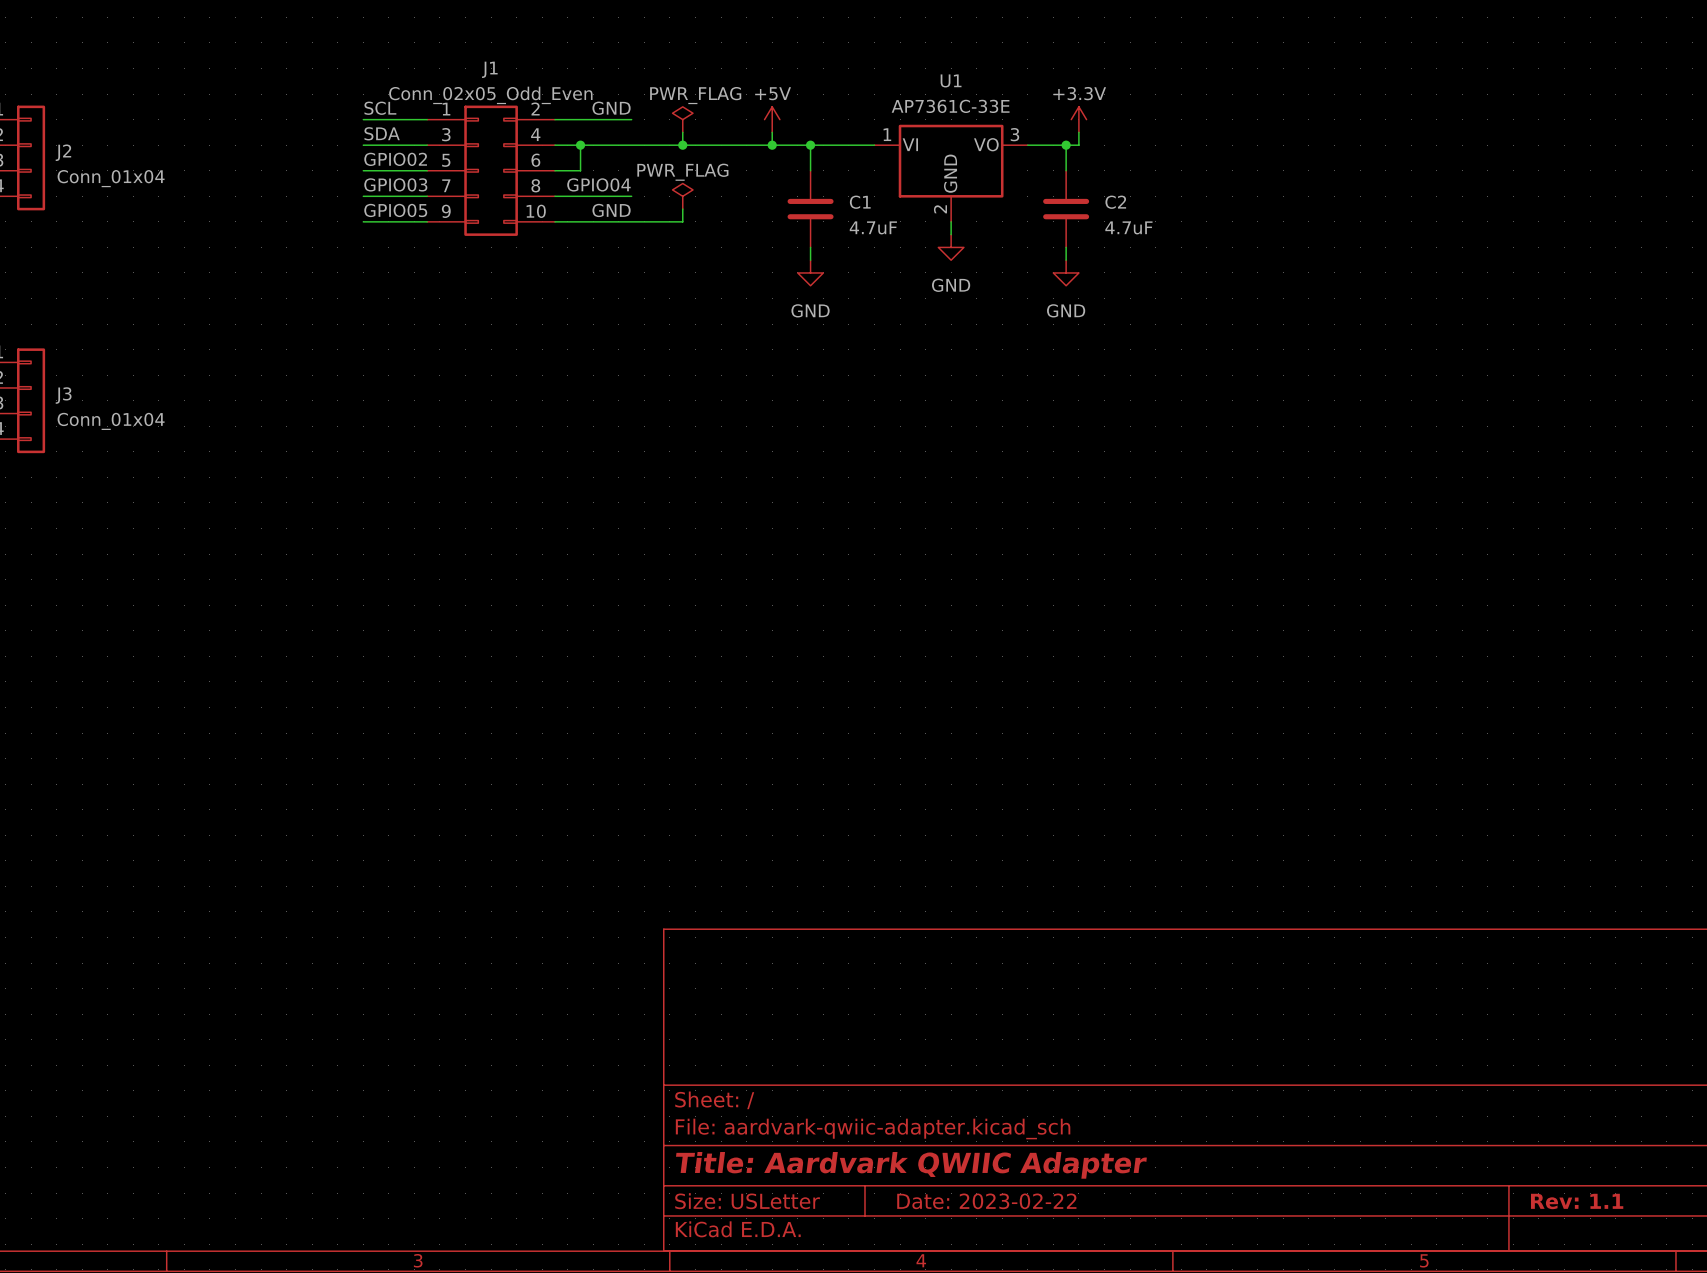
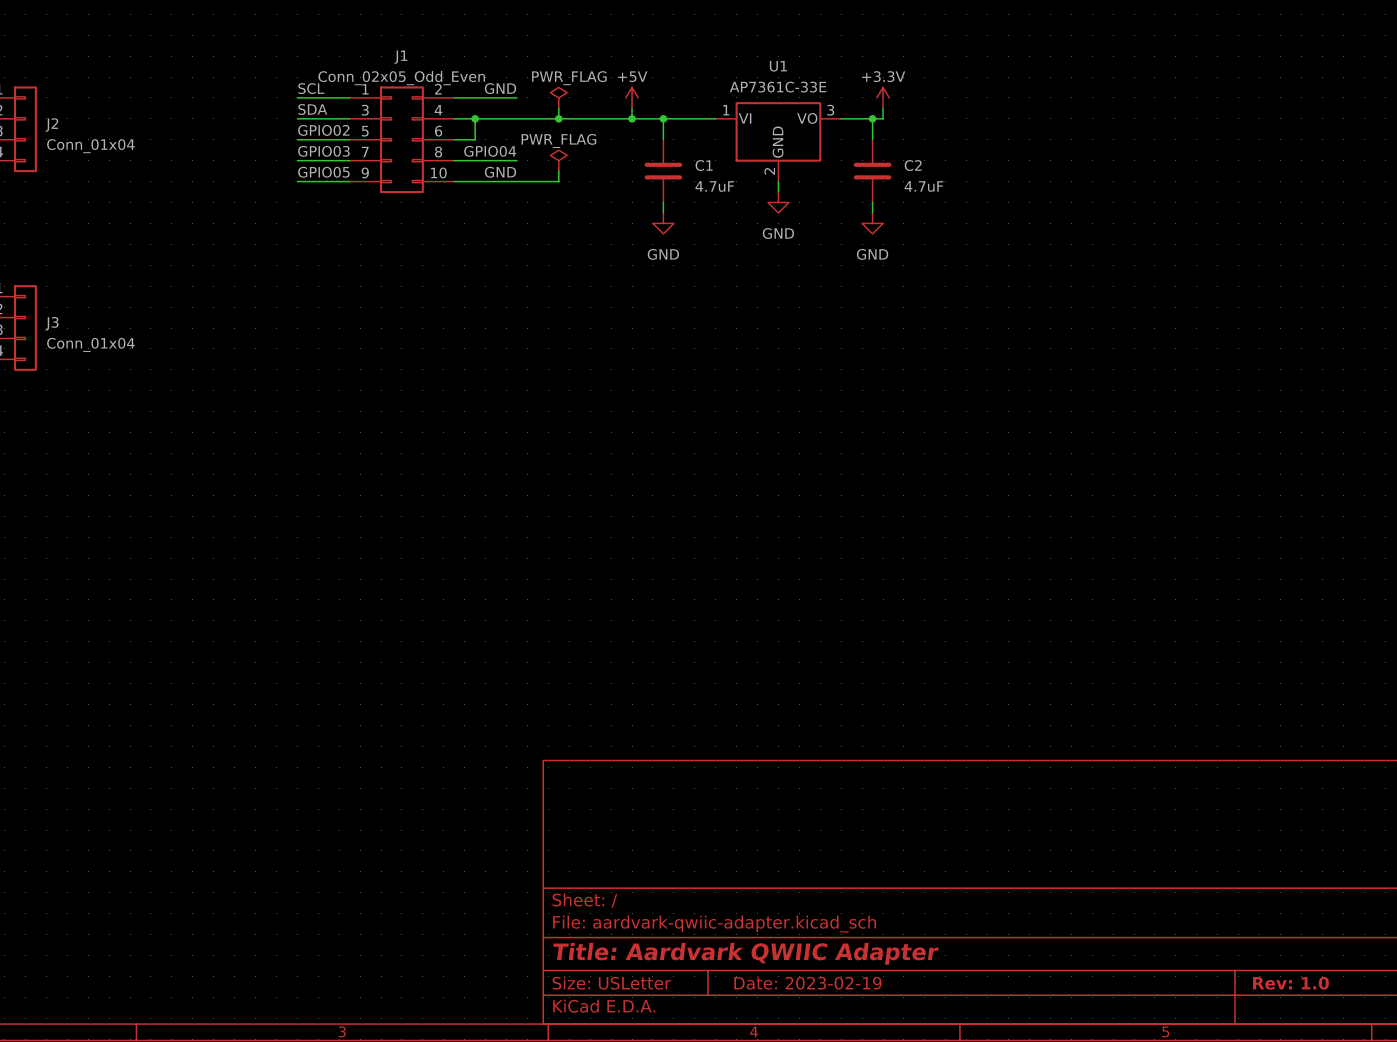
title block: Date: 2023-02-22 (986, 1201) -> Date: 2023-02-19 (807, 983)
title block: Rev: 1.1 (1577, 1201) -> Rev: 1.0 (1290, 983)

